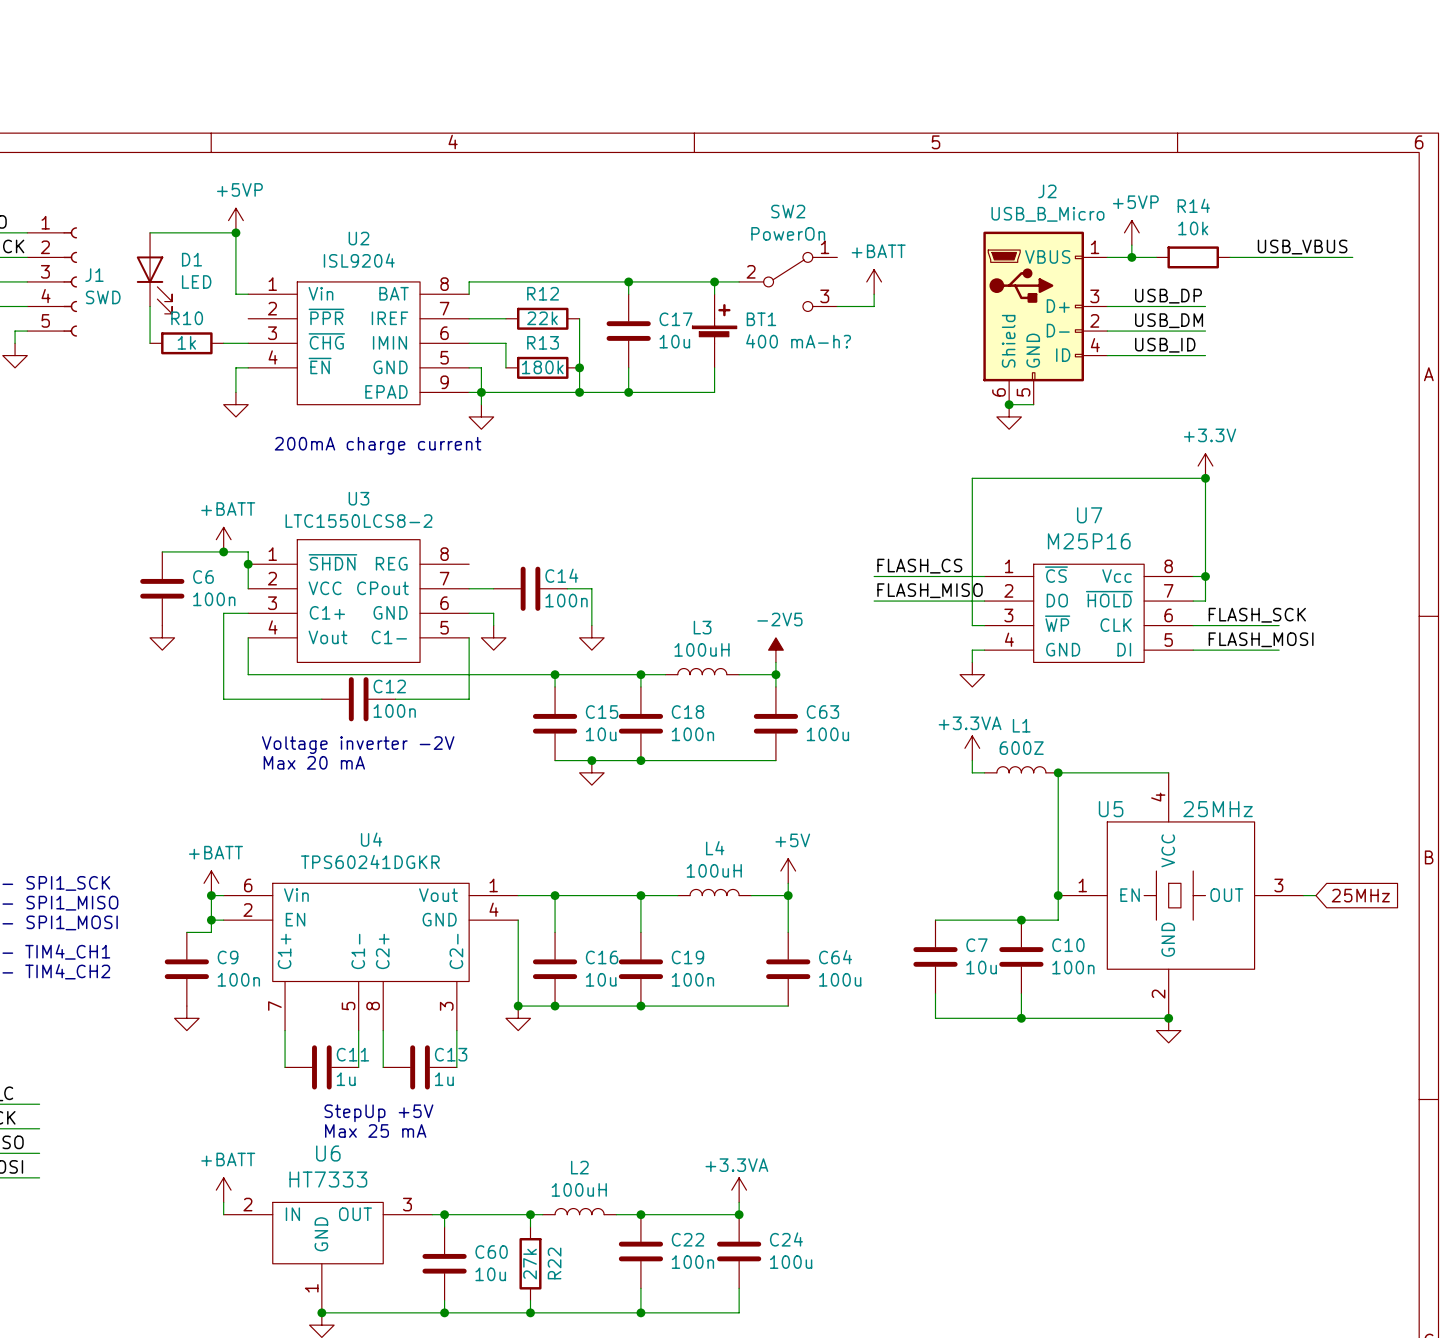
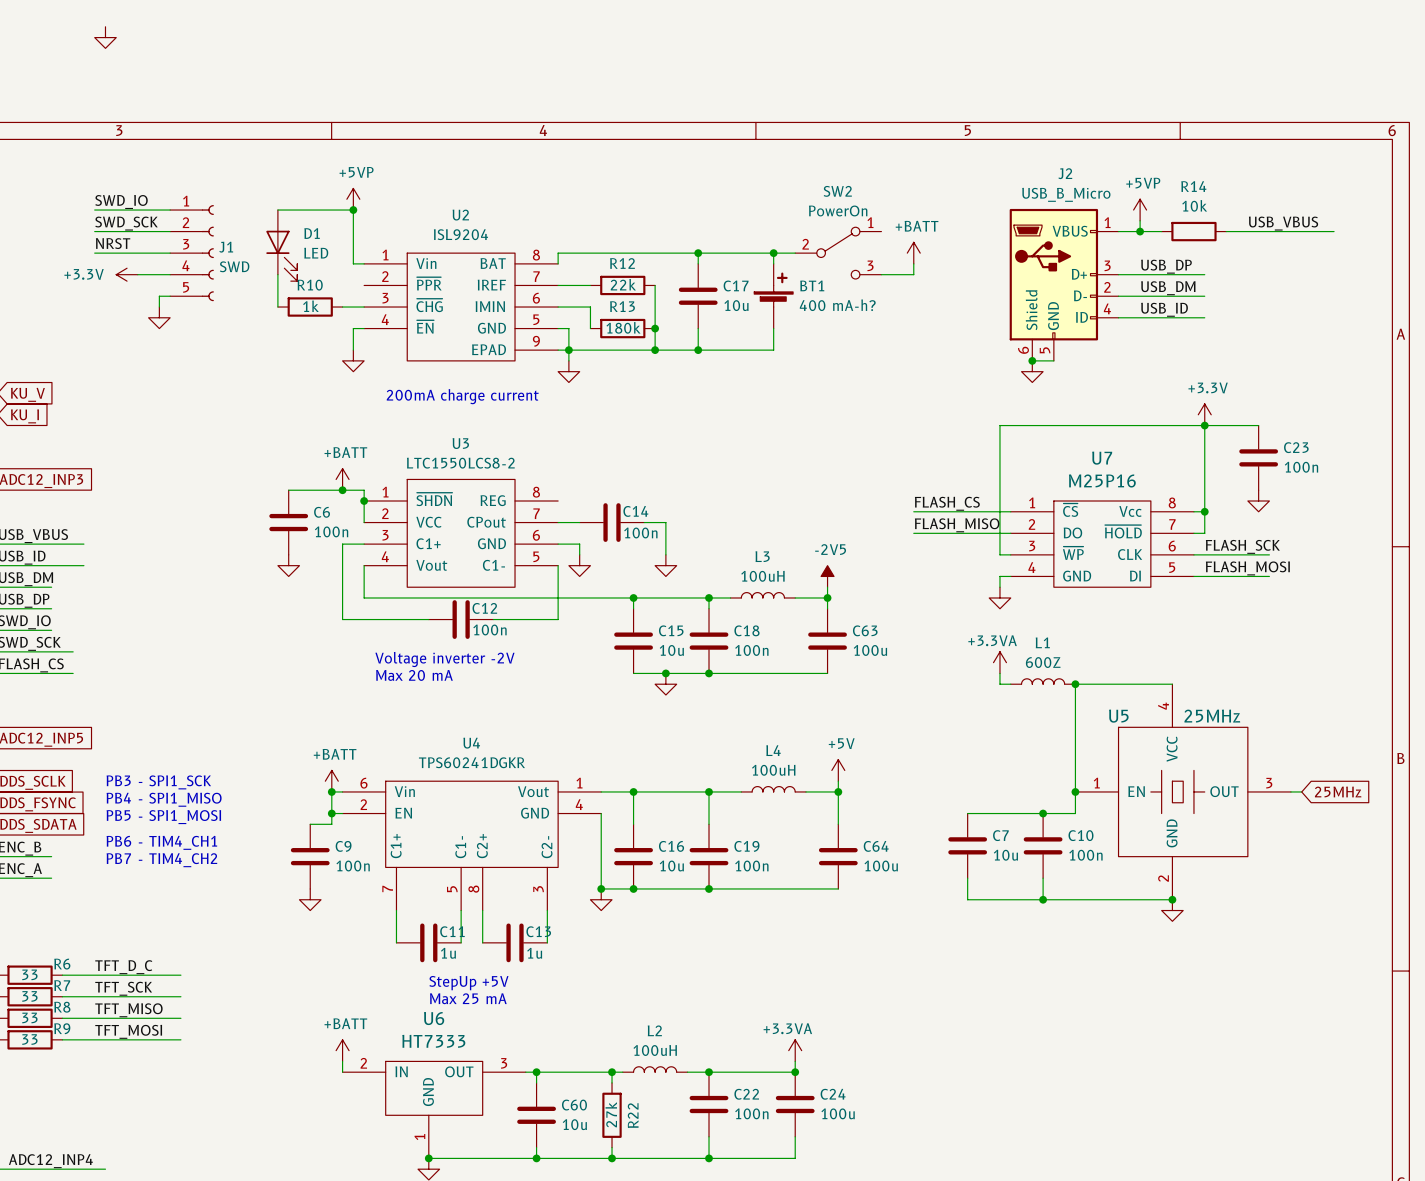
wire: none -> (1204, 425) (1258, 425)
C23: none -> 100n (1258, 457)
power symbol: none -> (1258, 501)

